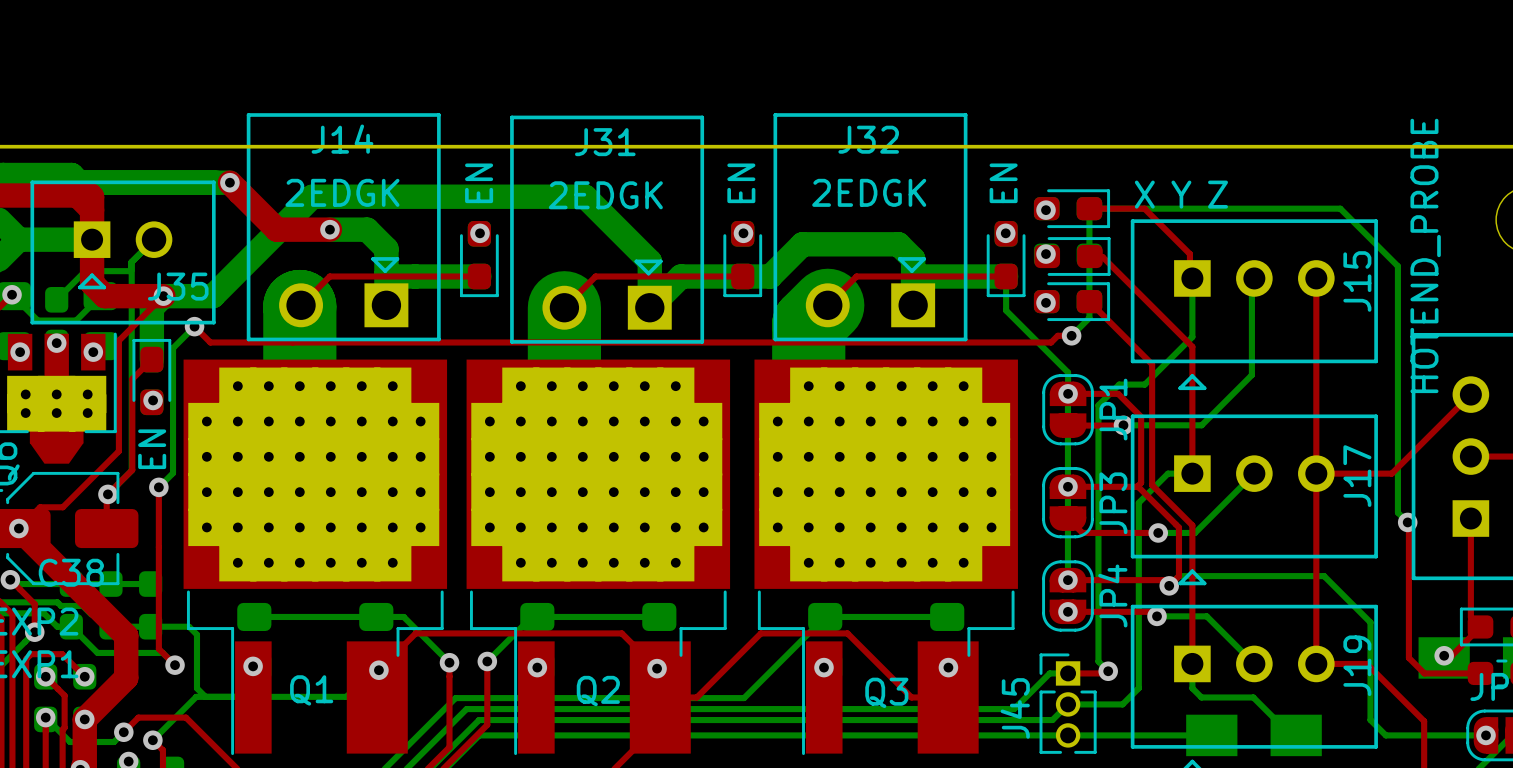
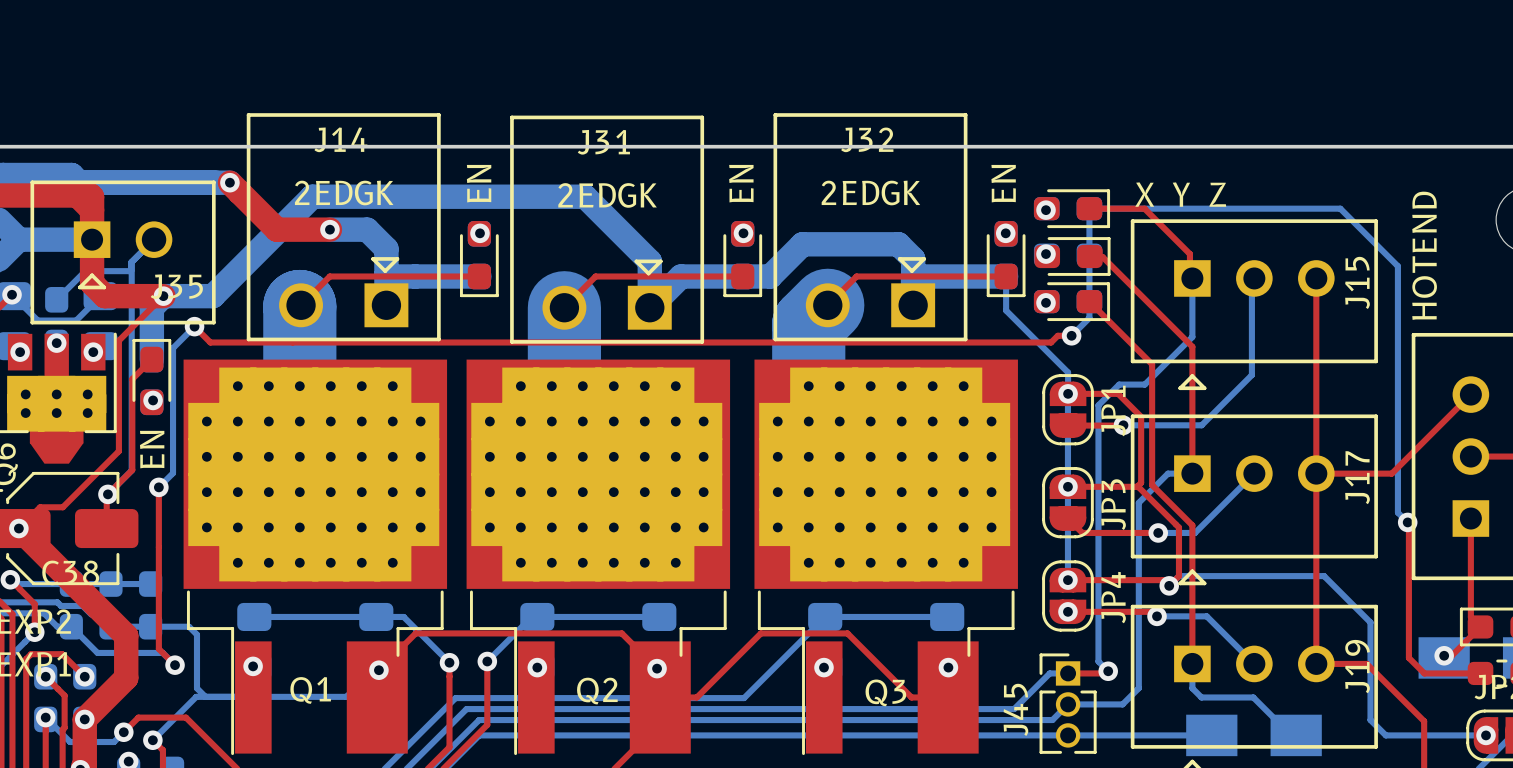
part value: HOTEND_PROBE (1425, 255) -> HOTEND (1424, 255)

